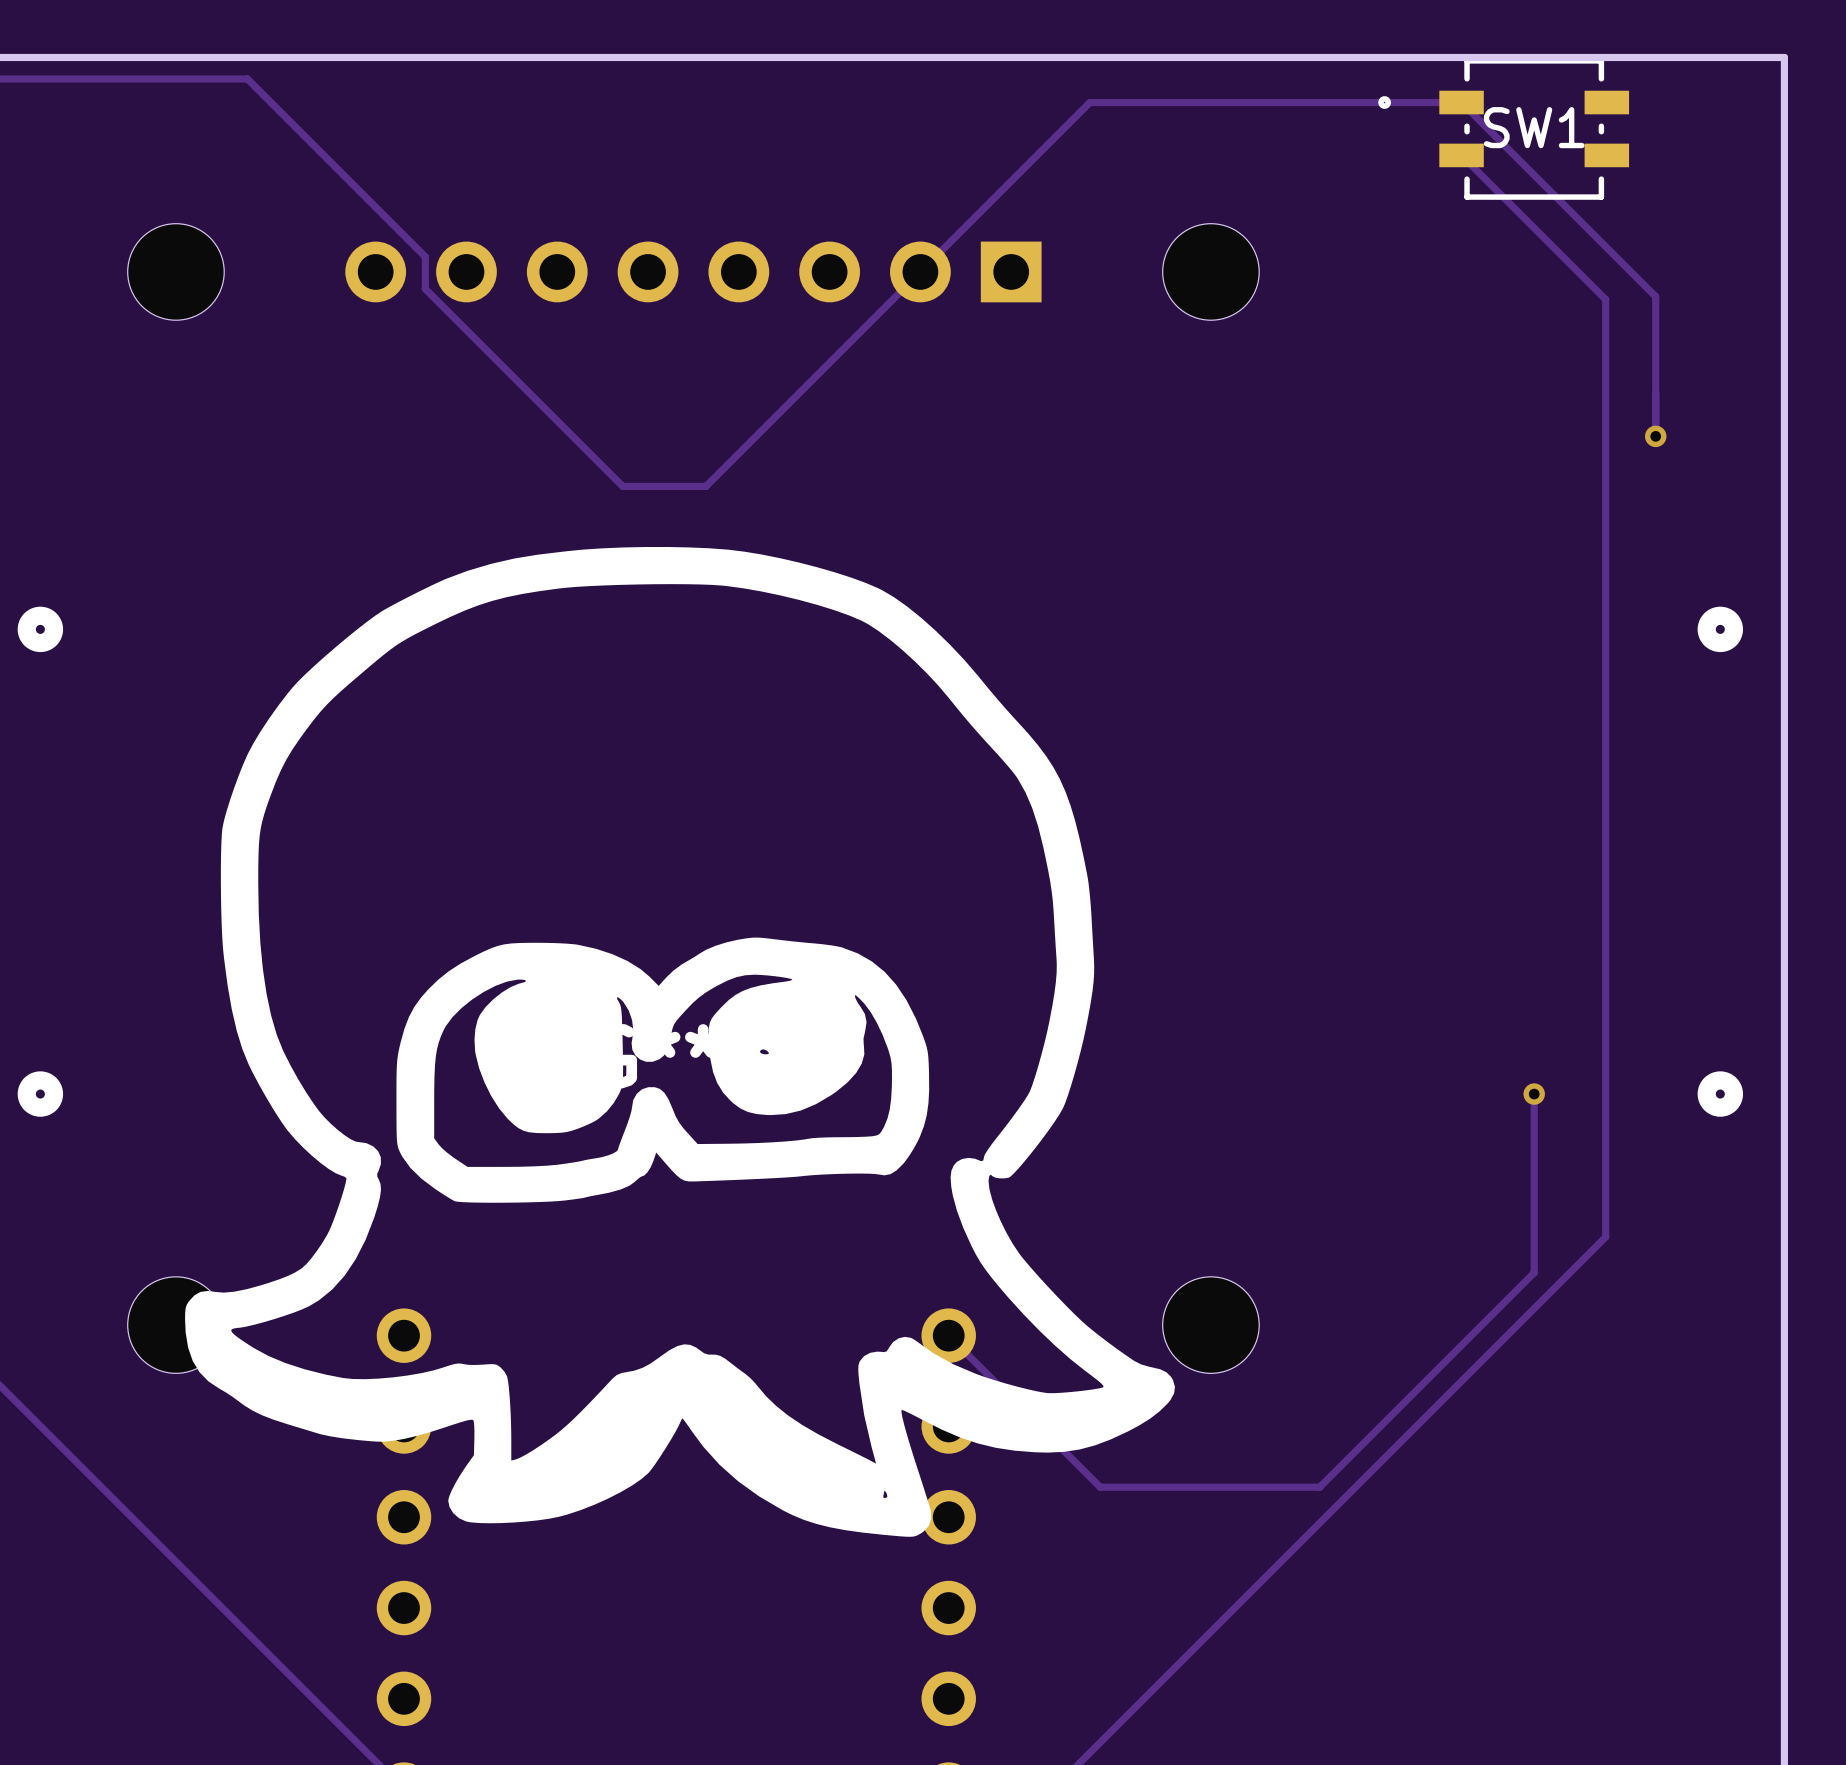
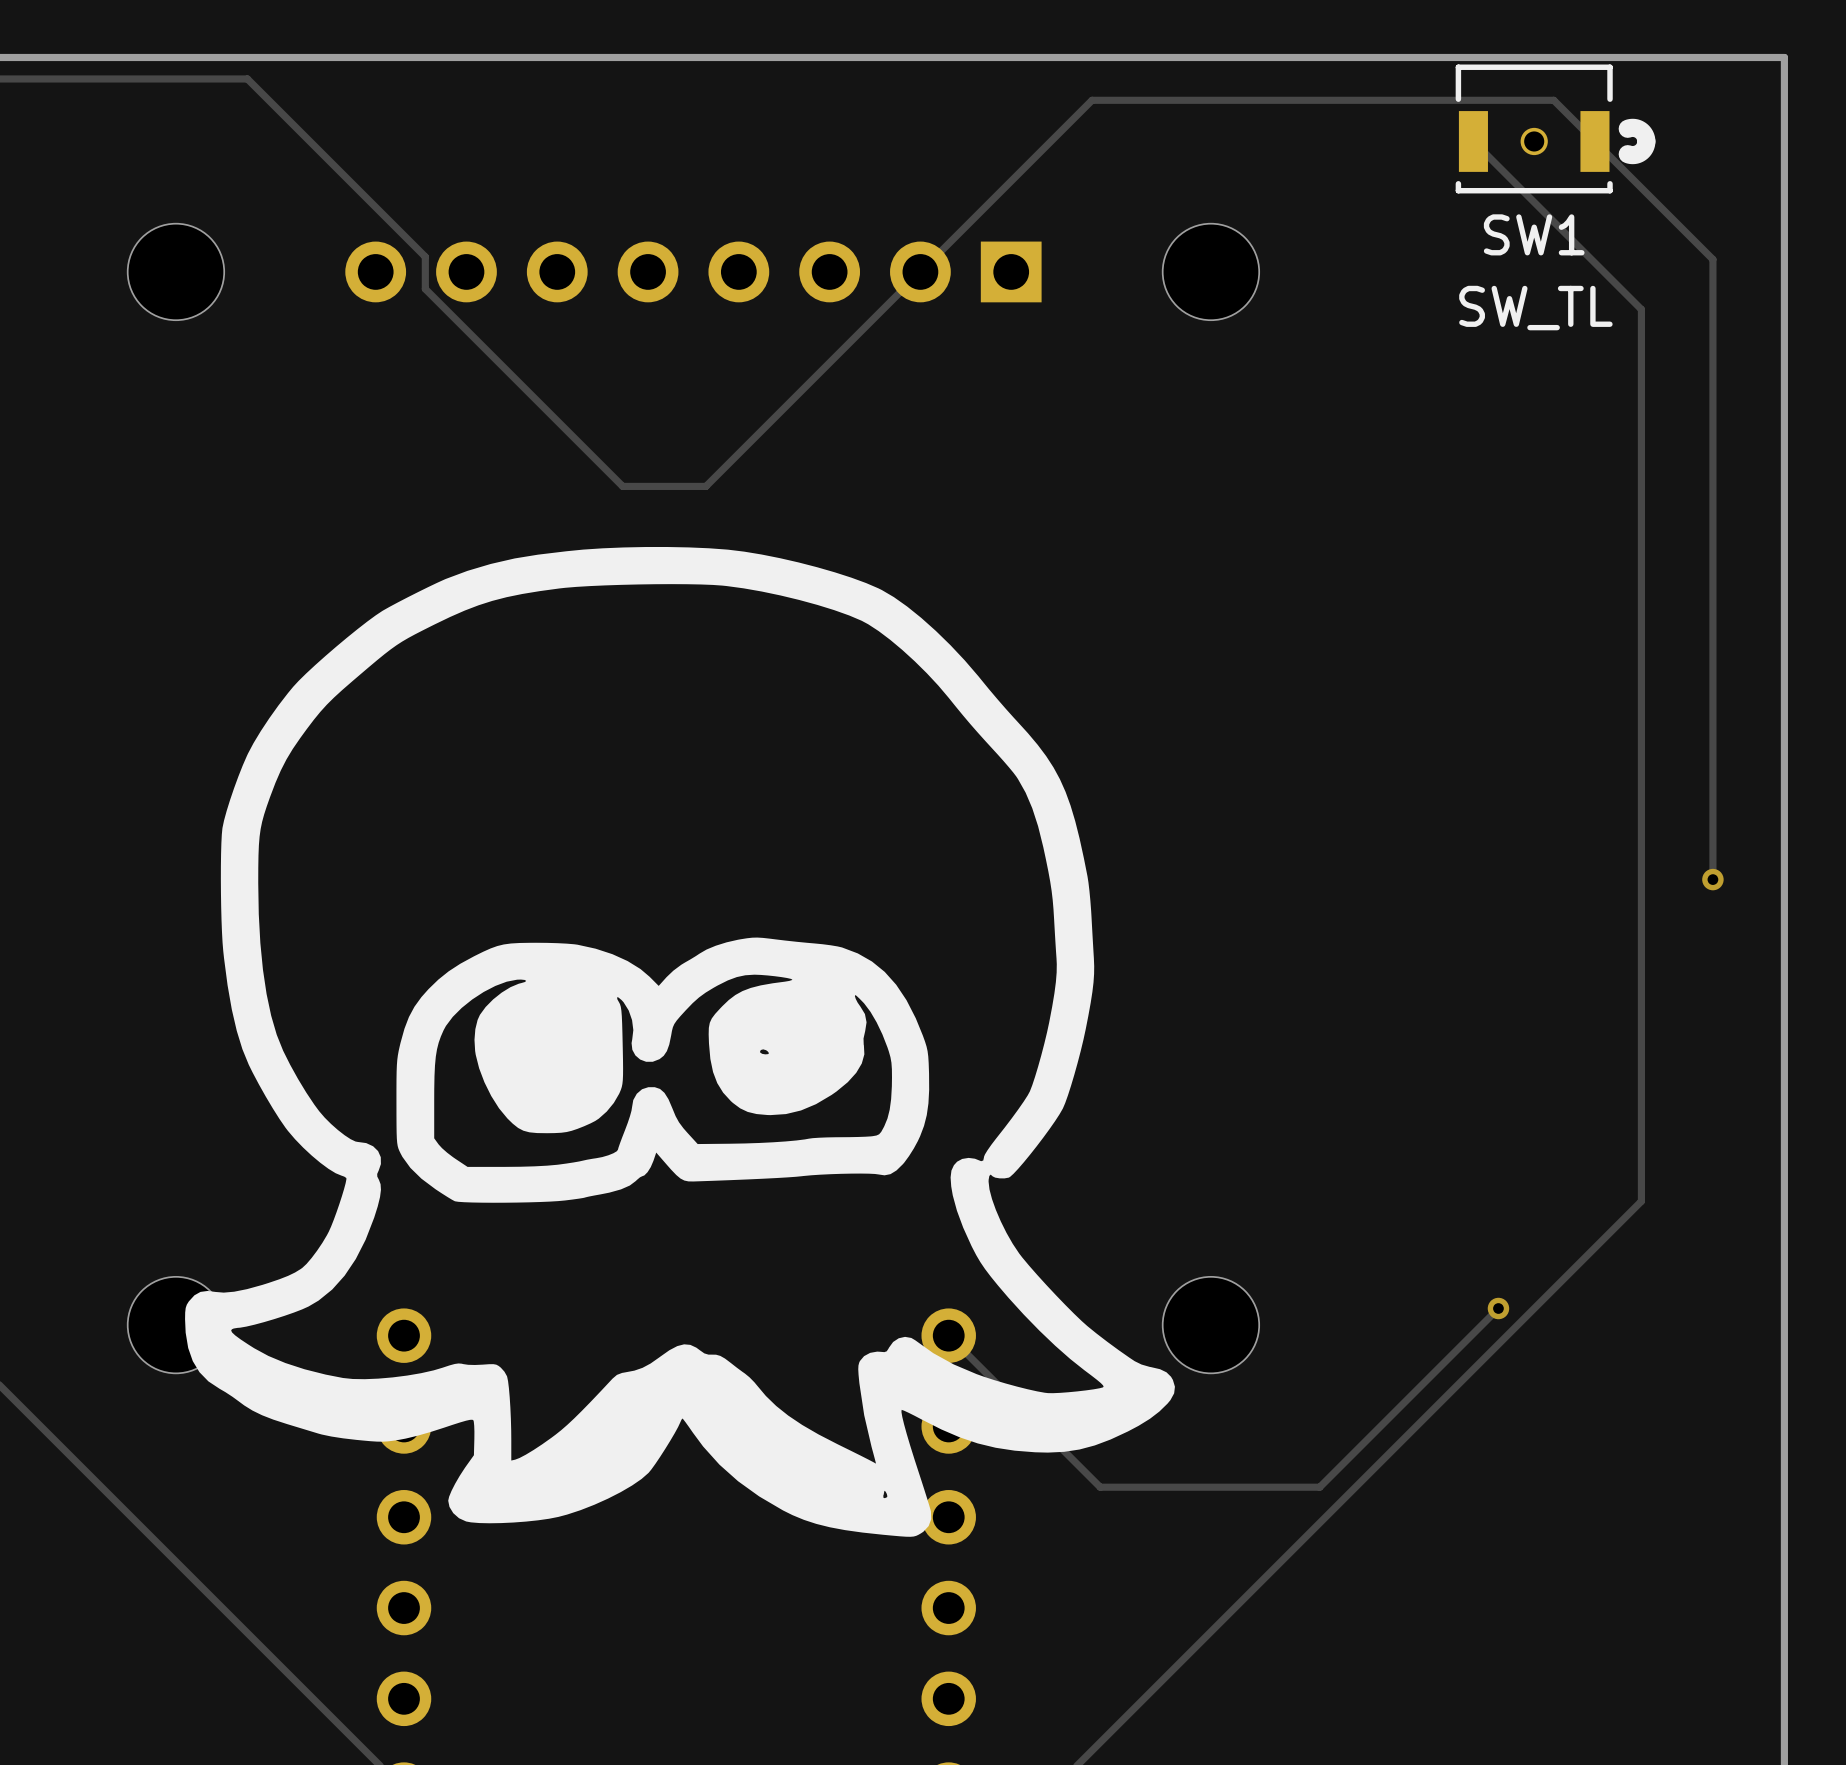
SW1 footprint: [1378, 58, 1630, 200] -> [1455, 64, 1656, 194]
track: (1089, 102) (1461, 102) (1655, 296) (1655, 436) -> (1089, 102) (1092, 100) (1553, 100) (1712, 259) (1712, 879)
SW1 name position: SW1 (1534, 127) -> SW1 (1534, 234)
track: (1461, 155) (1605, 299) (1605, 1237) -> (1473, 141) (1641, 309) (1641, 1201) (1605, 1237)
SW1 value: none -> SW_TL (1535, 308)
via: (1655, 436) -> none
drawing: none -> [185, 546, 1175, 1537]
part: (40, 629) -> none
part: (1720, 629) -> none
via: none -> (1712, 879)
part: (680, 1041) -> none
part: (40, 1094) -> none
track: (1534, 1094) (1534, 1272) (1498, 1308) -> none
via: (1534, 1094) -> none
part: (1720, 1094) -> none
via: none -> (1498, 1308)

